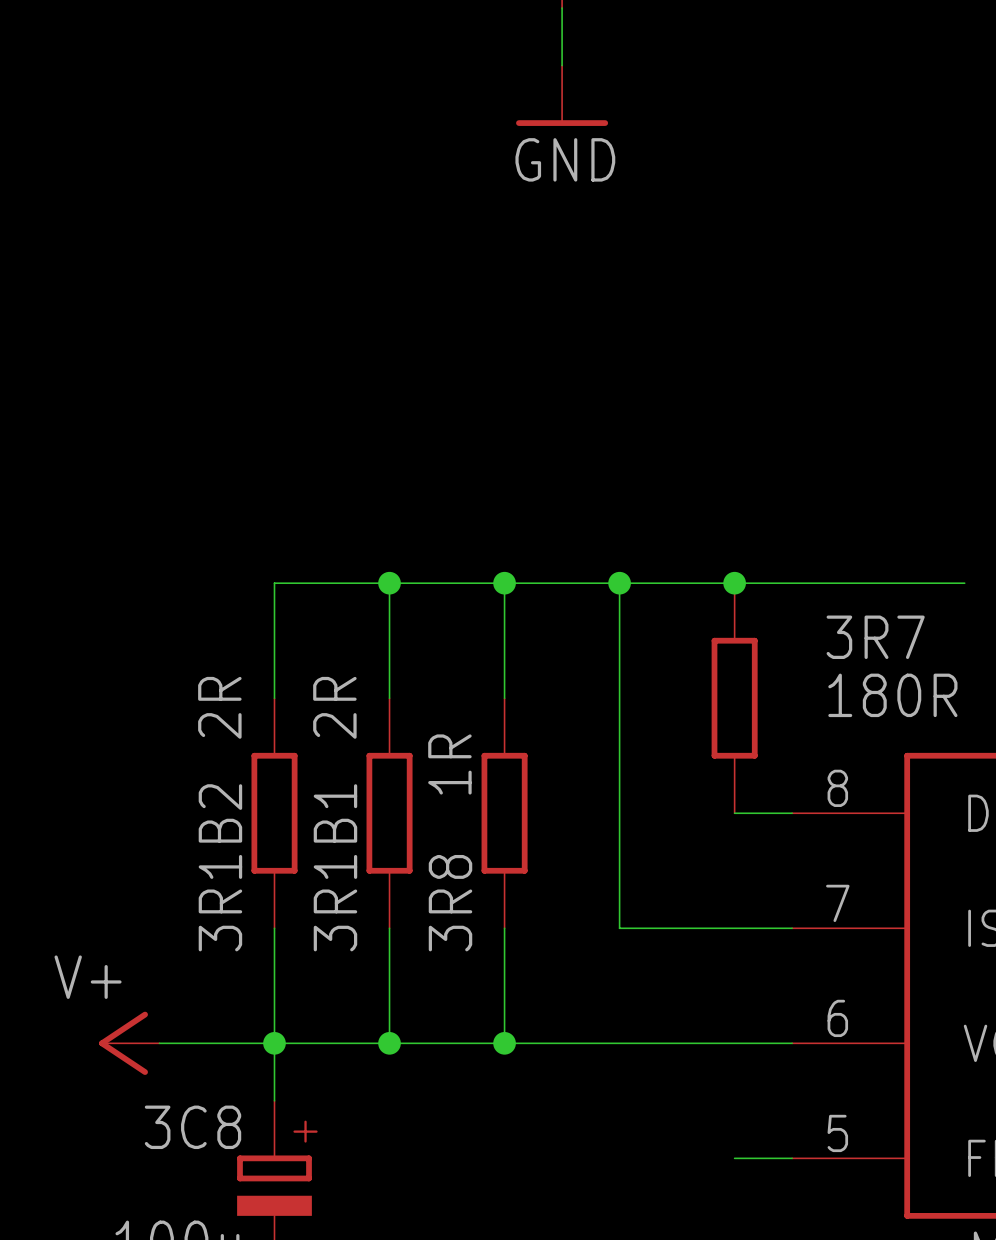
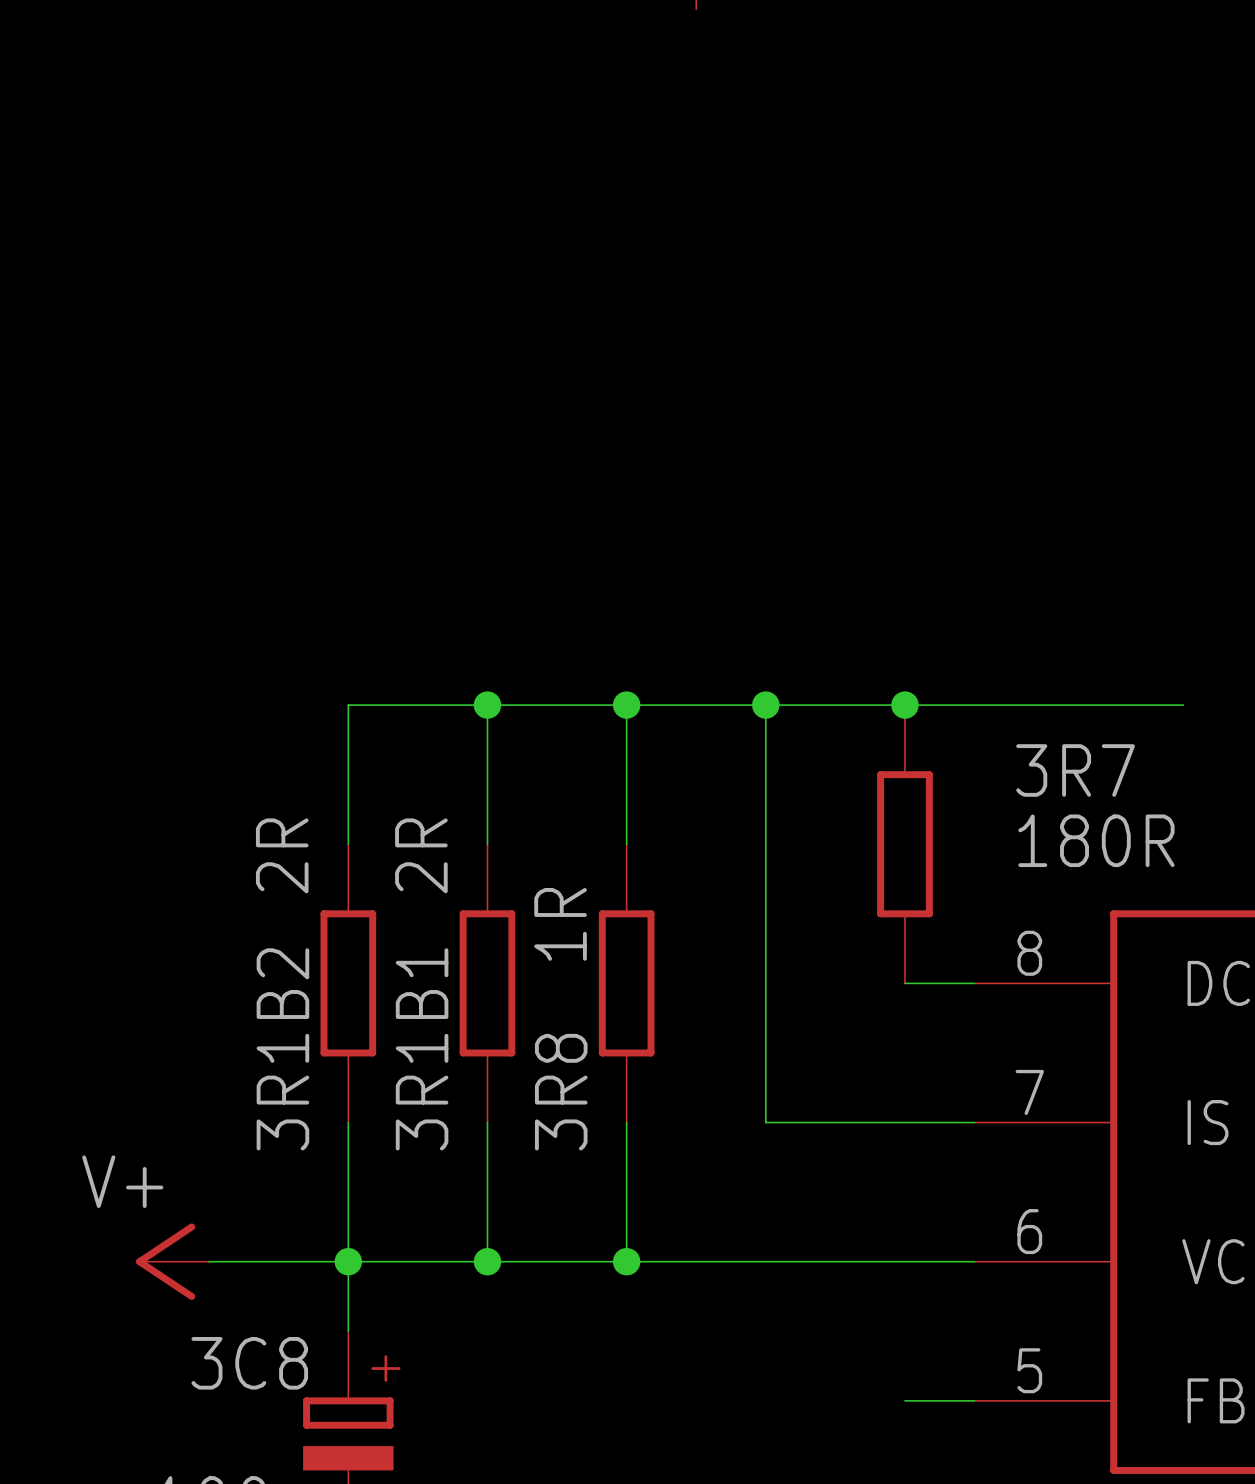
wire: (562, 8) (562, 65) -> none
power symbol: GND (562, 95) -> none

